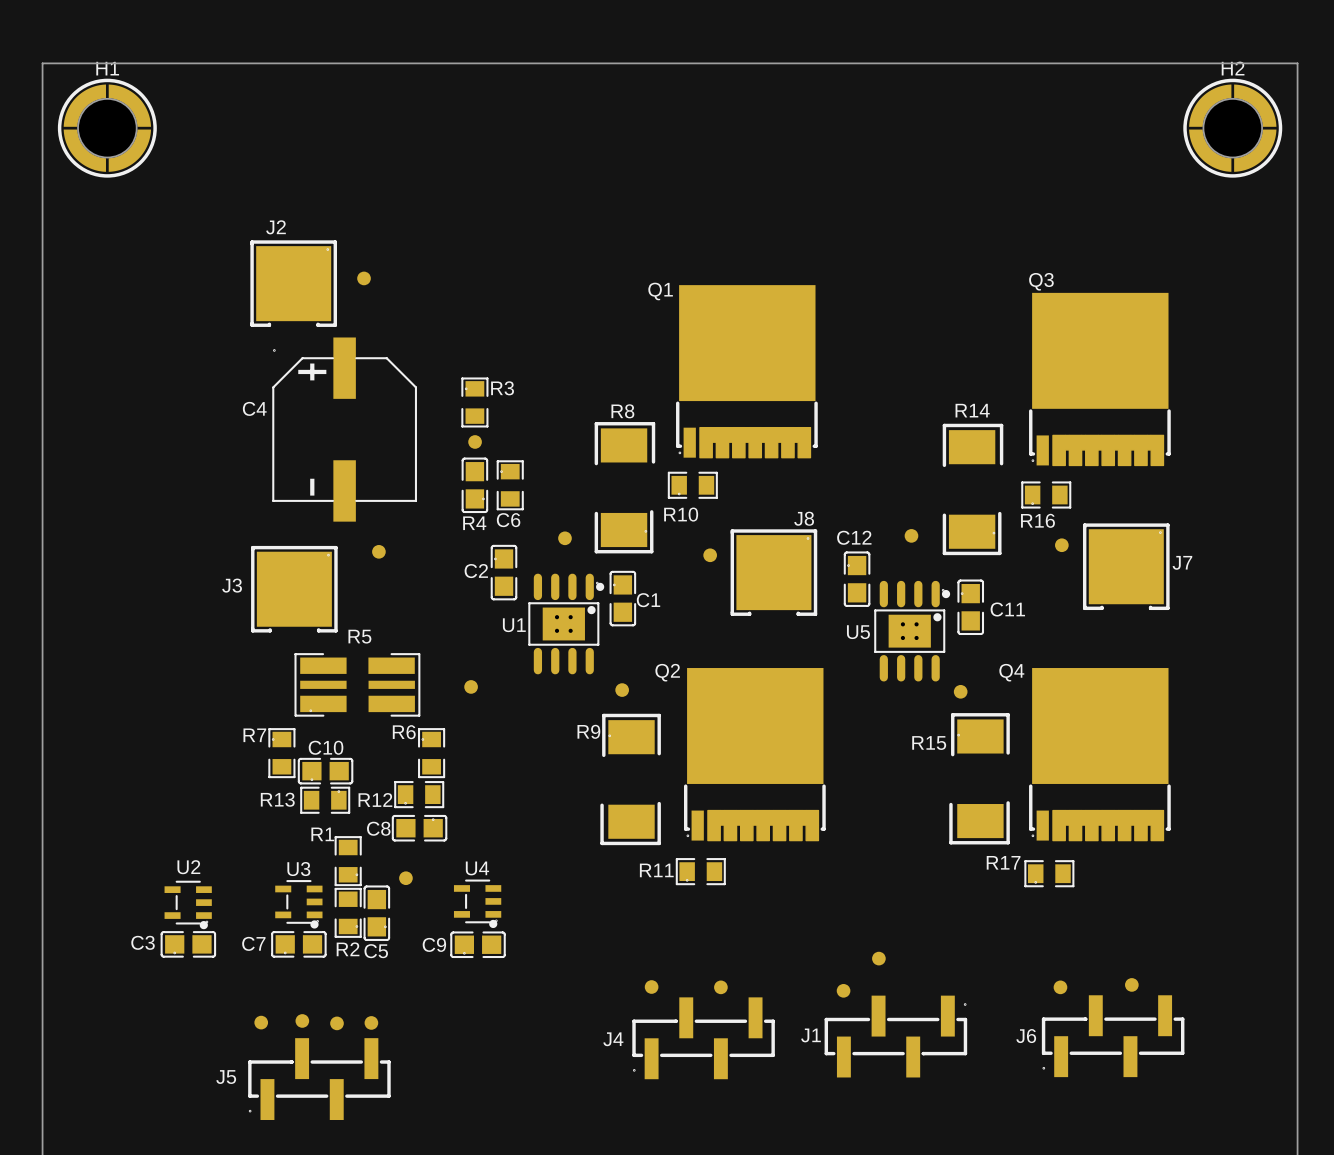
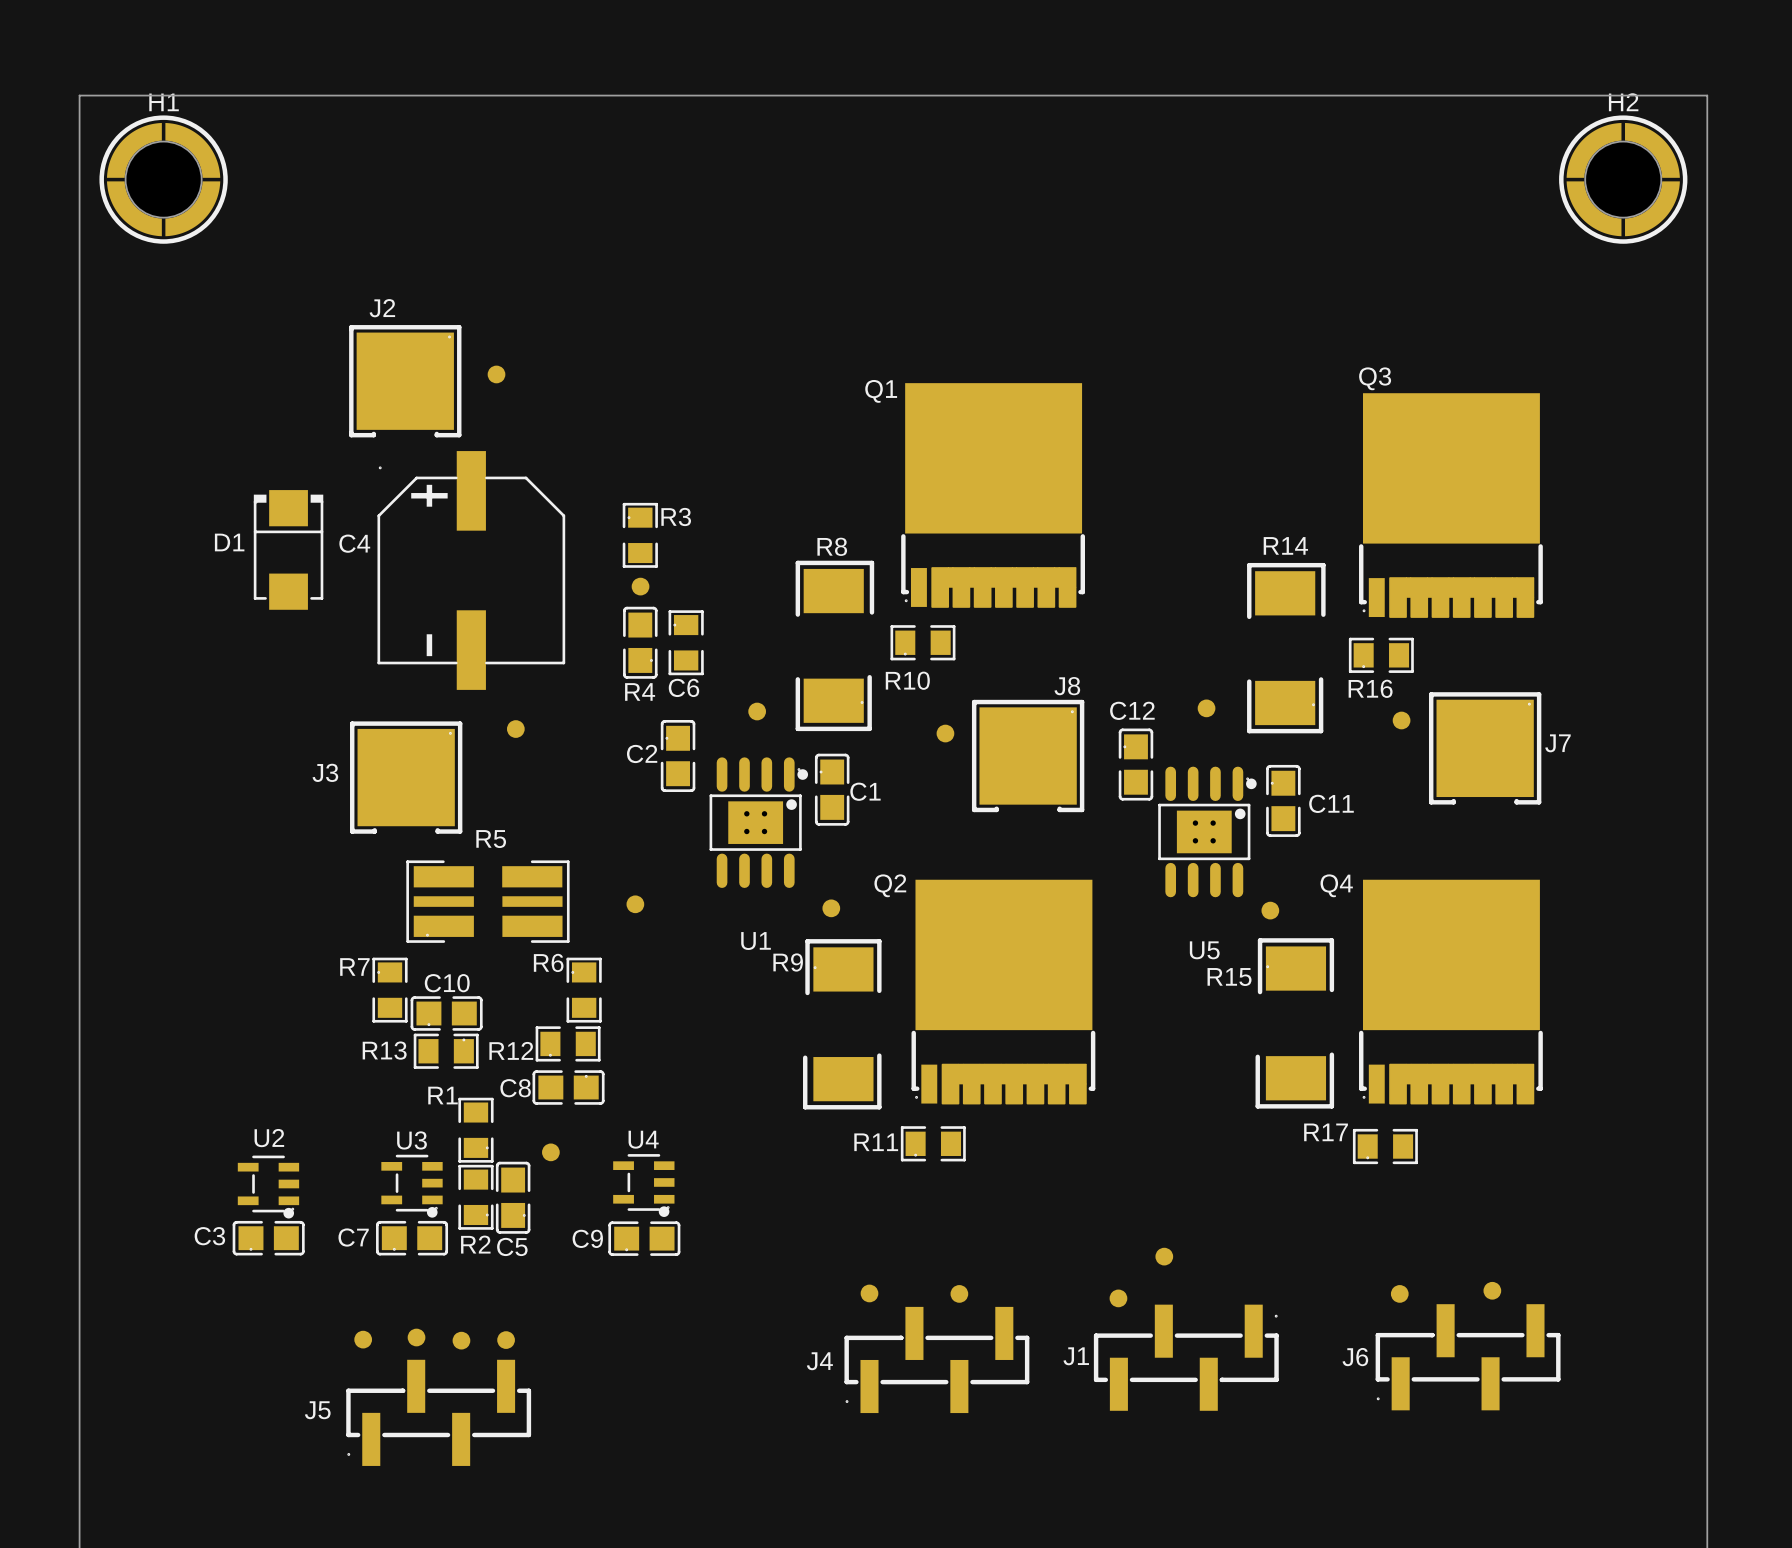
D1: none -> (288, 549)
U1 name position: U1 (514, 625) -> U1 (756, 941)
U5 name position: U5 (858, 632) -> U5 (1204, 950)

